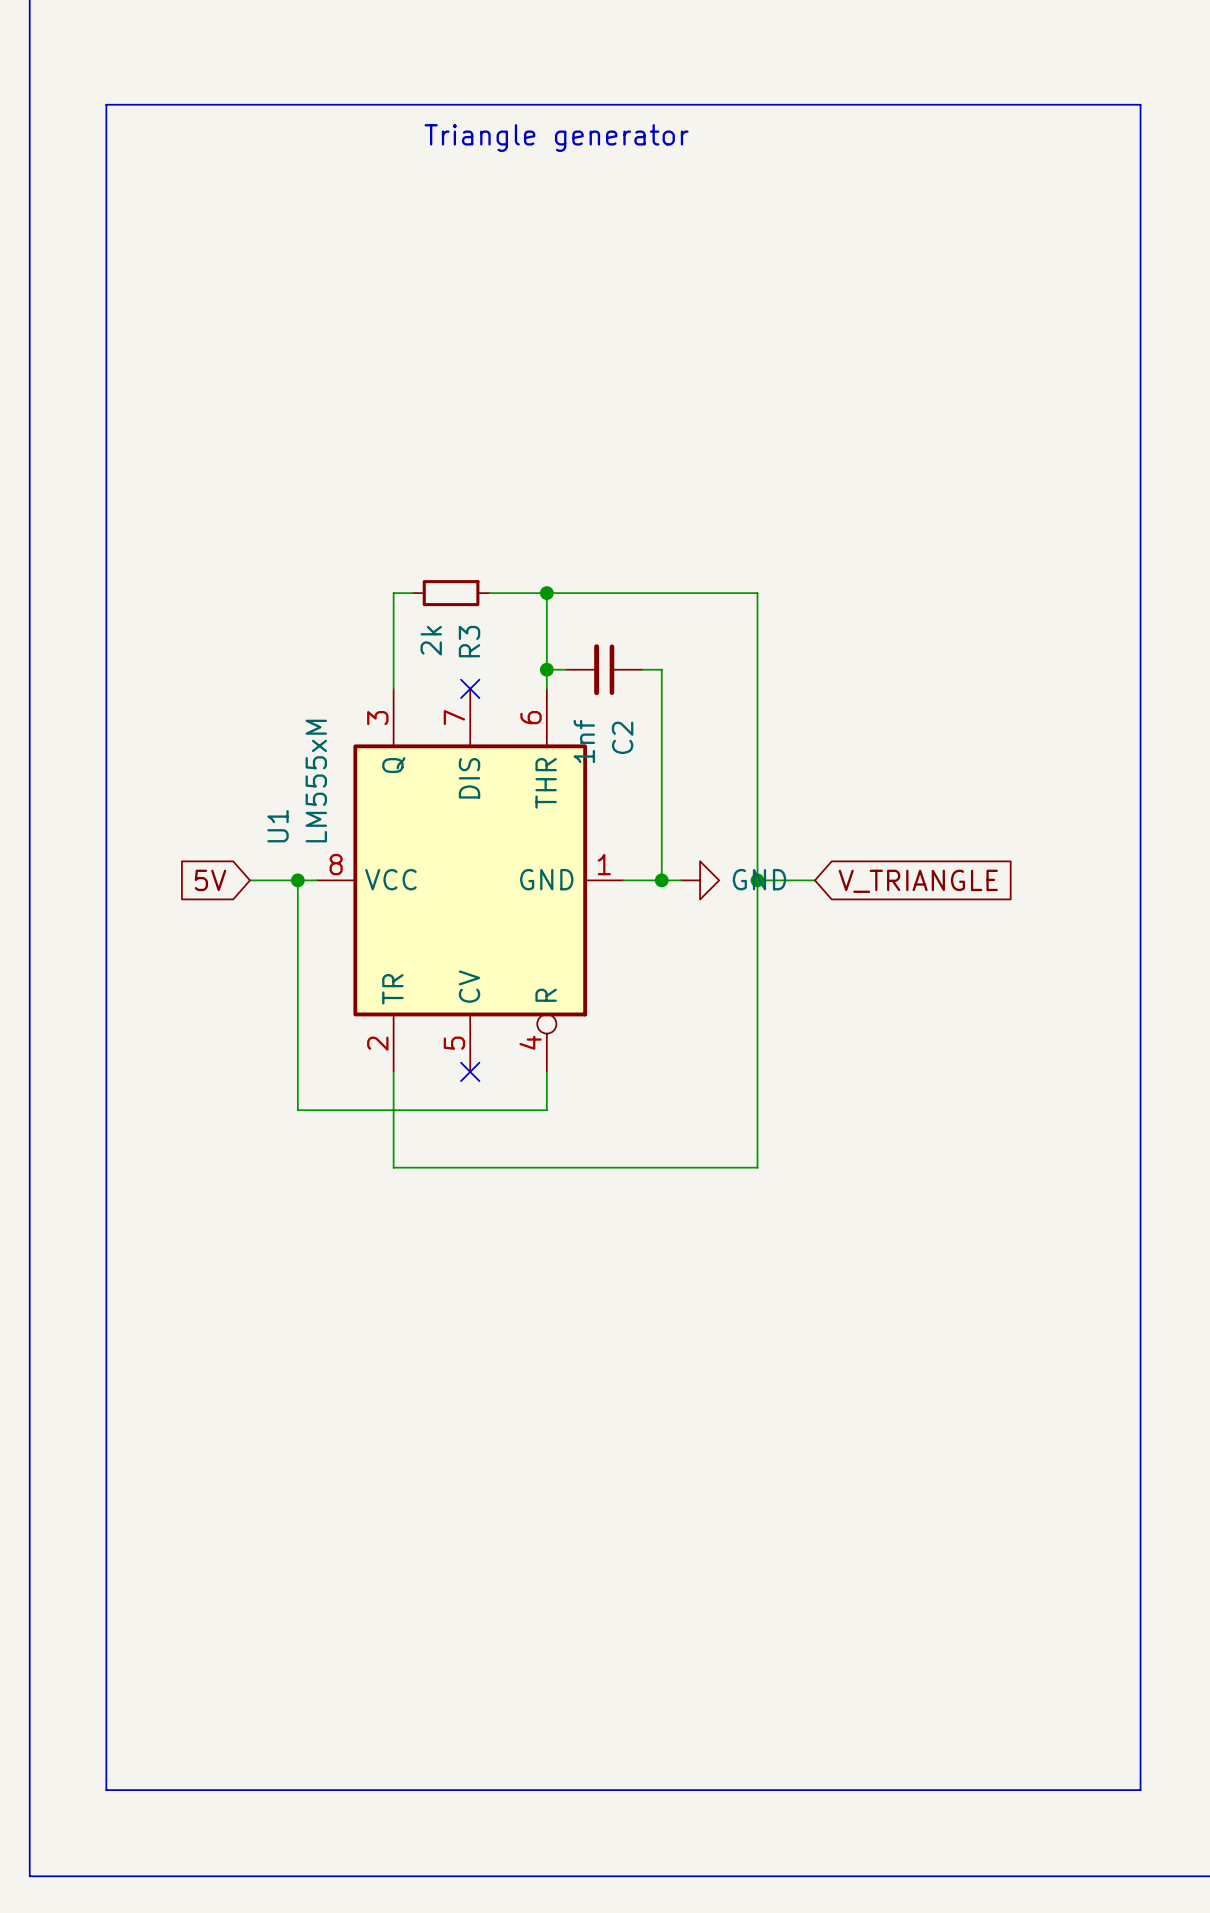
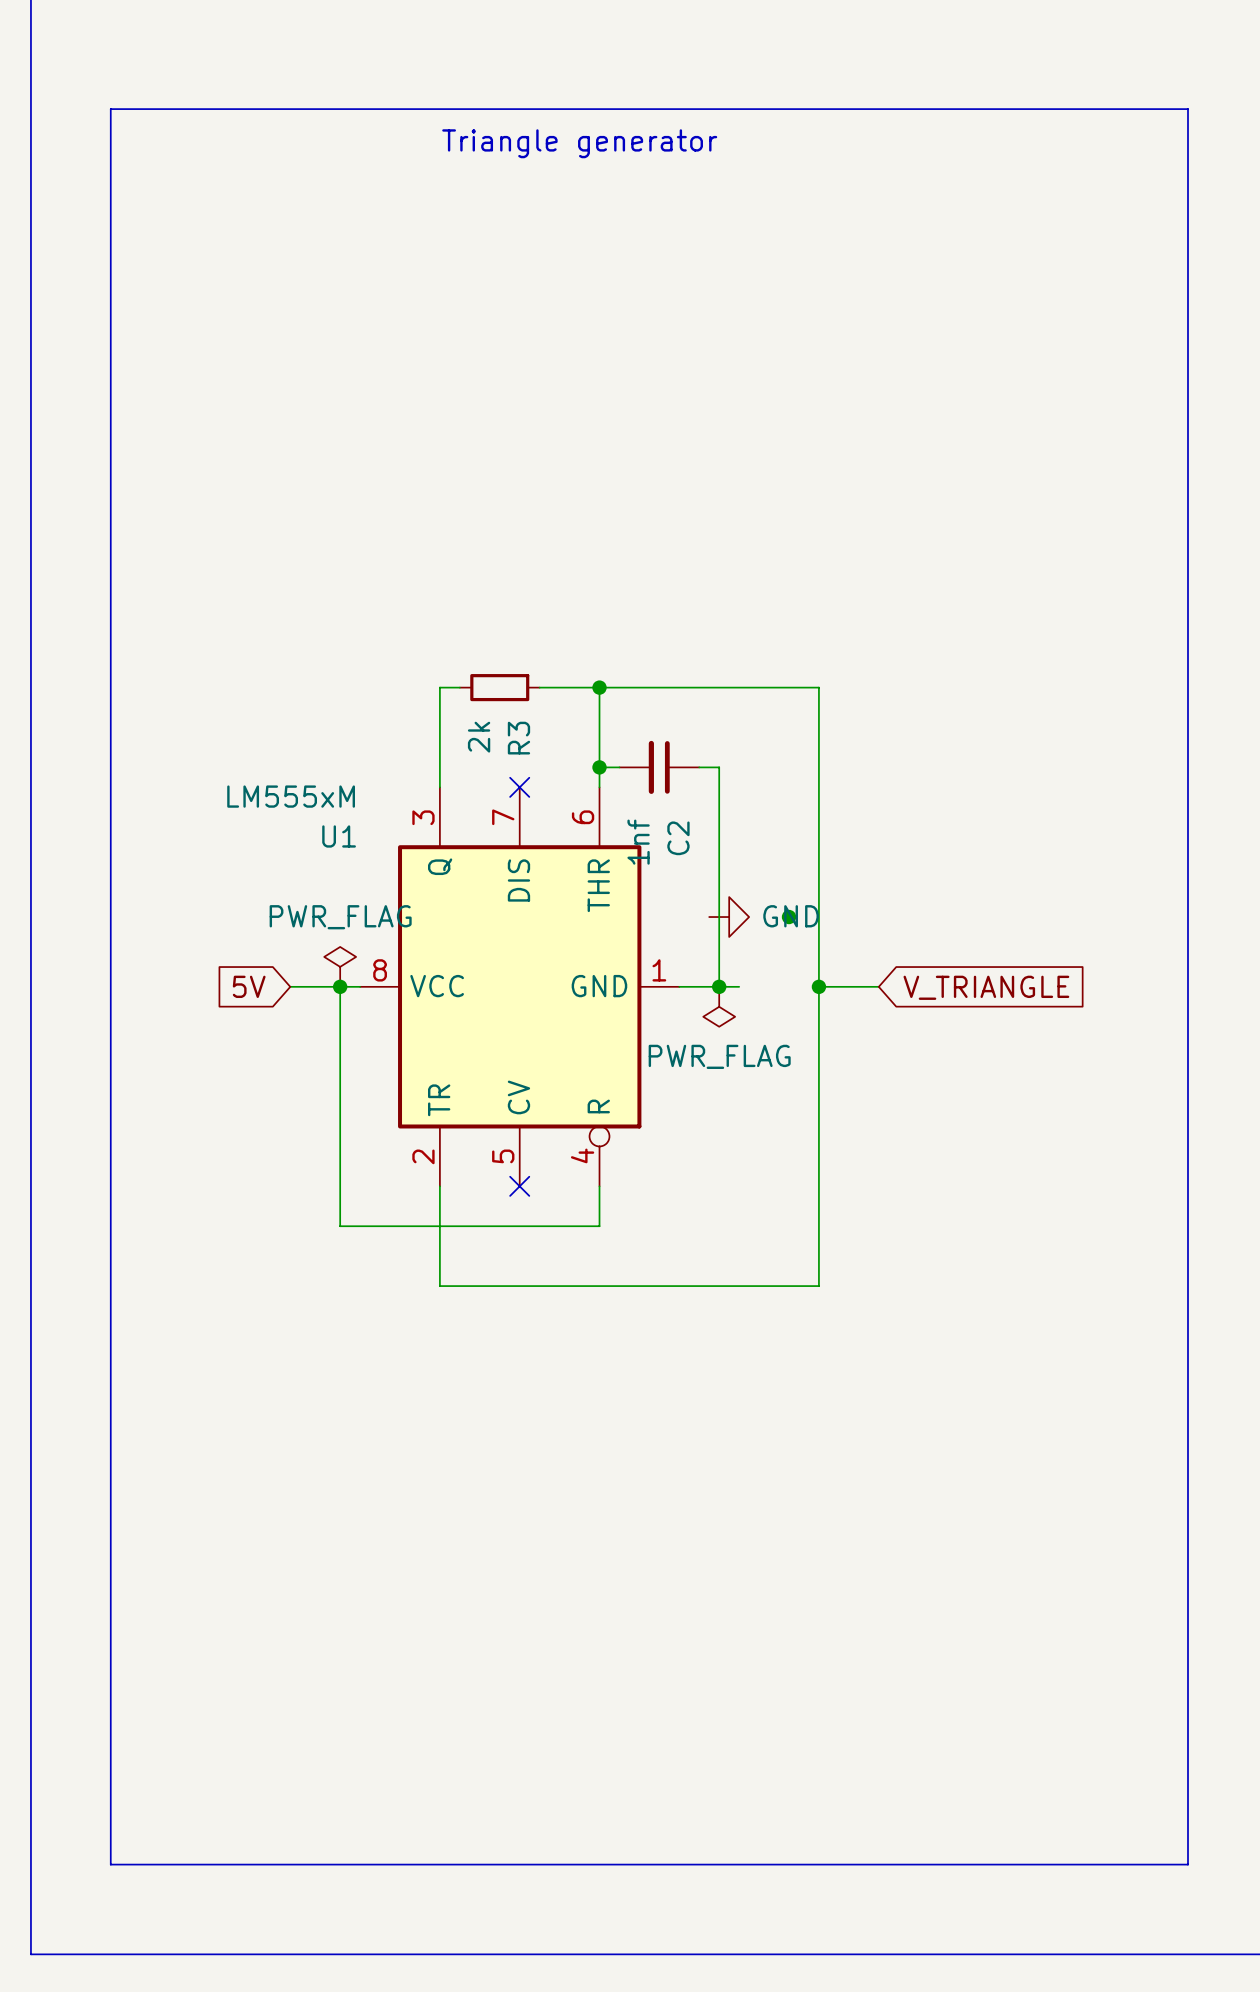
wire: (412, 593) (393, 593) (393, 688) -> (459, 687) (439, 687) (439, 787)
R3 position: (451, 593) -> (499, 687)
wire: (489, 593) (757, 593) (757, 1167) (393, 1167) (393, 1071) -> (539, 687) (818, 687) (818, 1286) (439, 1286) (439, 1186)
wire: (546, 593) (546, 688) -> (599, 687) (599, 787)
junction: (546, 593) -> none
wire: (546, 669) (565, 669) -> (599, 767) (619, 767)
junction position: (546, 669) -> (599, 687)
C2 position: (604, 669) -> (659, 767)
wire: (642, 669) (661, 669) (661, 880) -> (699, 767) (719, 767) (719, 986)
no-connect mark position: (470, 688) -> (519, 787)
junction: none -> (599, 767)
U1 value rotation: 0° (316, 781) -> 90° clockwise (291, 796)
U1 name rotation: 0° (277, 826) -> 90° clockwise (339, 836)
global label position: 5V (210, 880) -> 5V (249, 986)
wire: (249, 880) (317, 880) -> (290, 986) (360, 986)
wire: (297, 880) (297, 1110) (546, 1110) (546, 1071) -> (340, 986) (340, 1226) (599, 1226) (599, 1186)
junction position: (297, 880) -> (340, 986)
U1 position: (470, 880) -> (519, 986)
wire: (623, 880) (680, 880) -> (679, 986) (739, 986)
junction: (661, 880) -> none
wire: (757, 880) (814, 880) -> (818, 986) (878, 986)
global label position: V_TRIANGLE (918, 881) -> V_TRIANGLE (986, 987)
power symbol: none -> PWR_FLAG (340, 966)
junction: none -> (719, 986)
junction: none -> (818, 986)
power symbol: none -> PWR_FLAG (719, 1006)
no-connect mark position: (470, 1071) -> (519, 1186)

